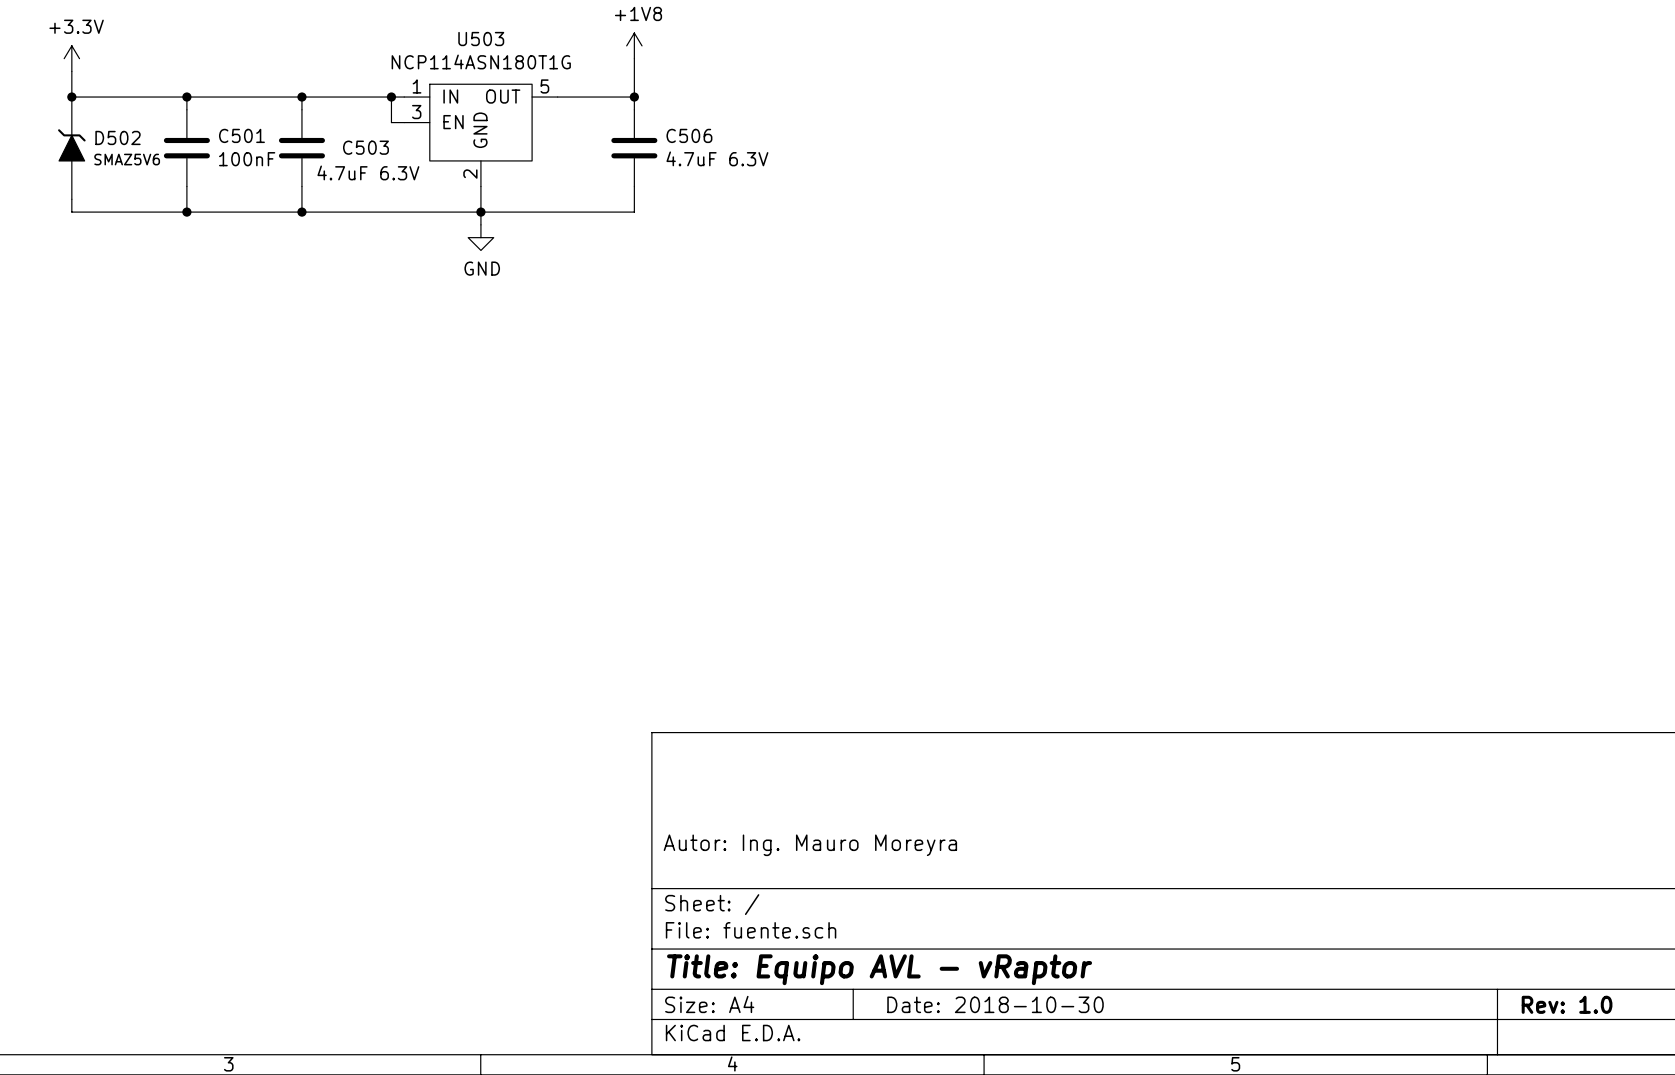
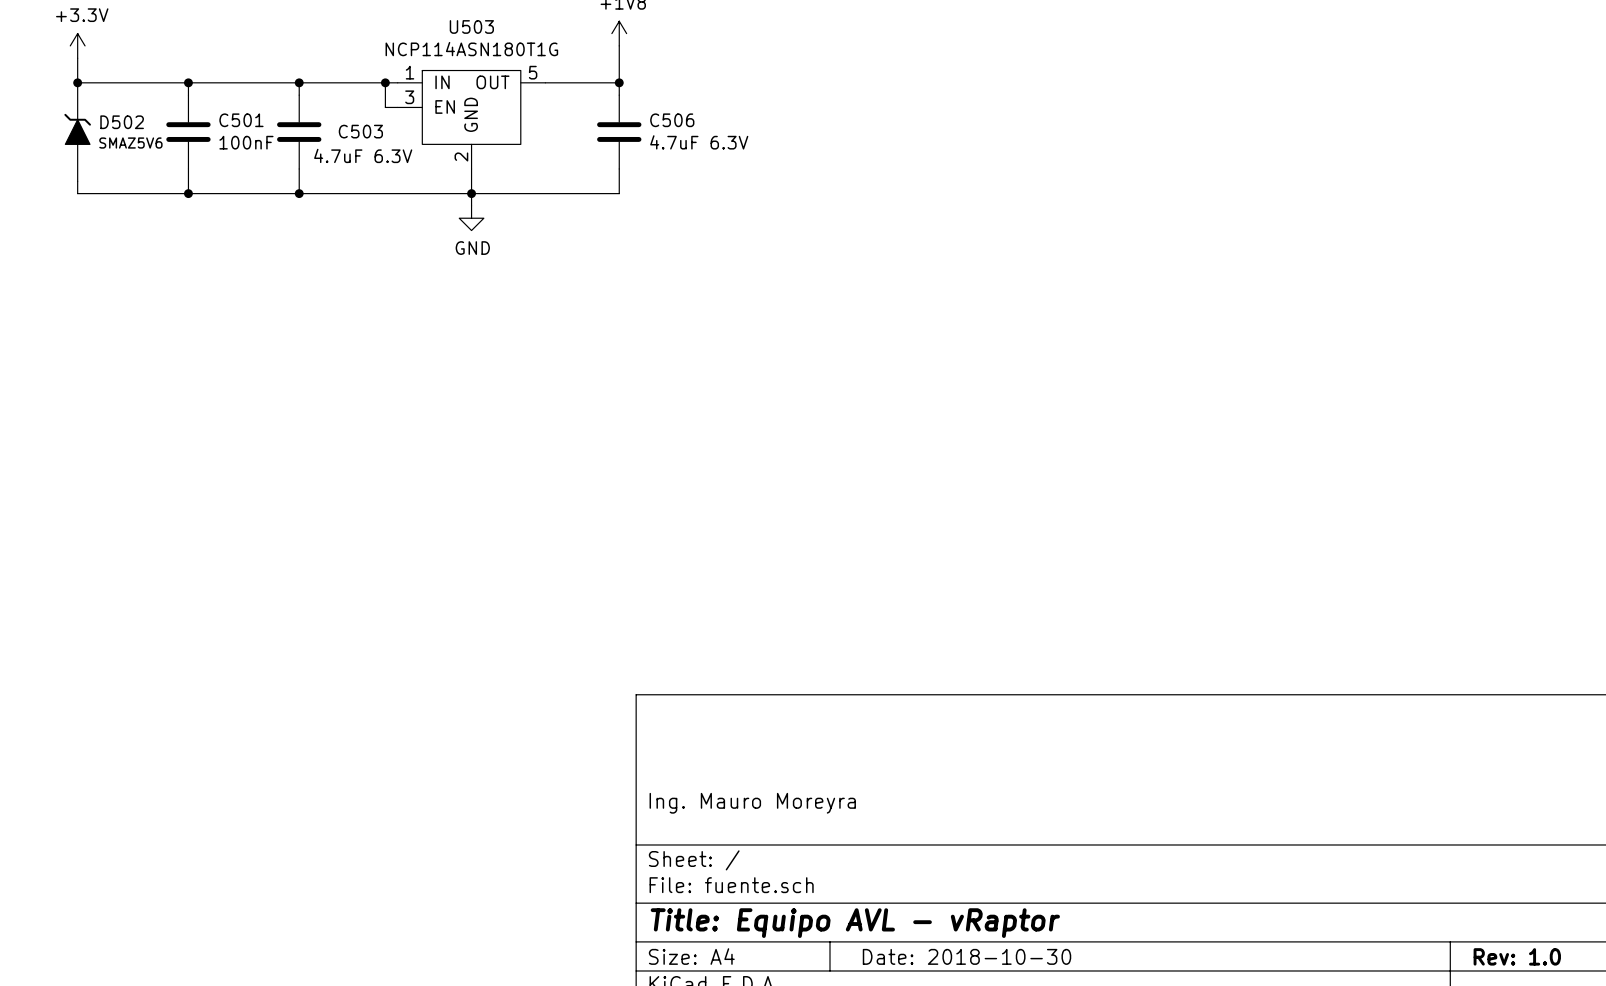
title block: Autor: Ing. Mauro Moreyra (810, 845) -> Ing. Mauro Moreyra (752, 803)

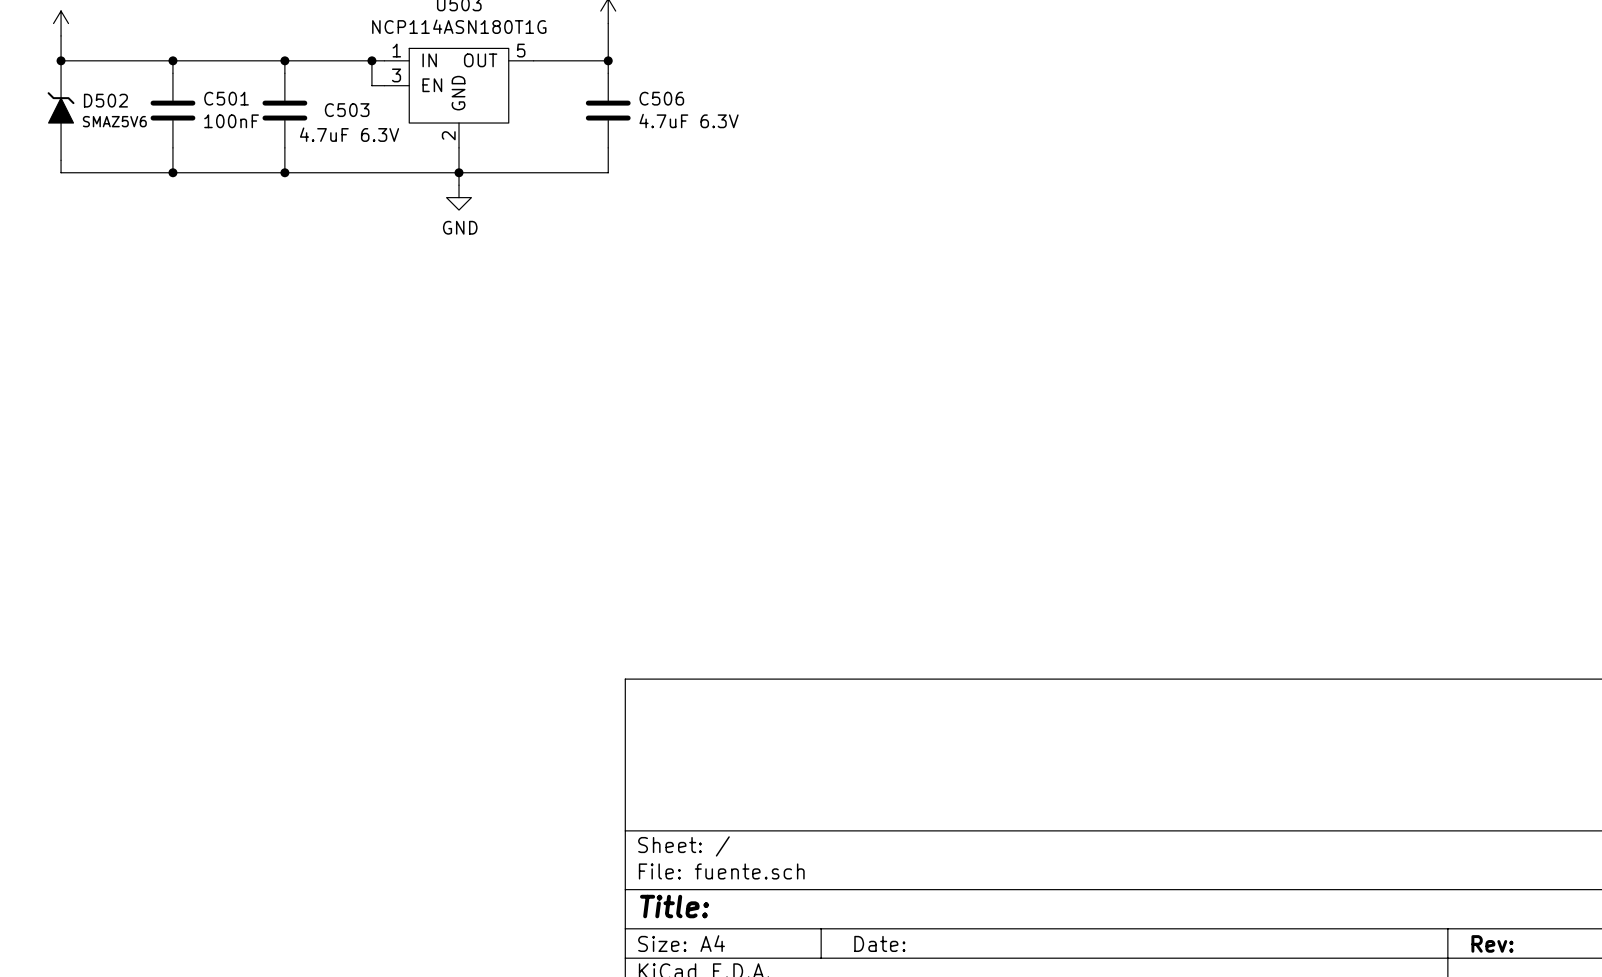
title block: Ing. Mauro Moreyra (752, 803) -> none
title block: Title: Equipo AVL - vRaptor (855, 923) -> Title: (674, 906)
title block: Date: 2018-10-30 (967, 956) -> Date: (879, 943)
title block: Rev: 1.0 (1517, 956) -> Rev: (1492, 943)

